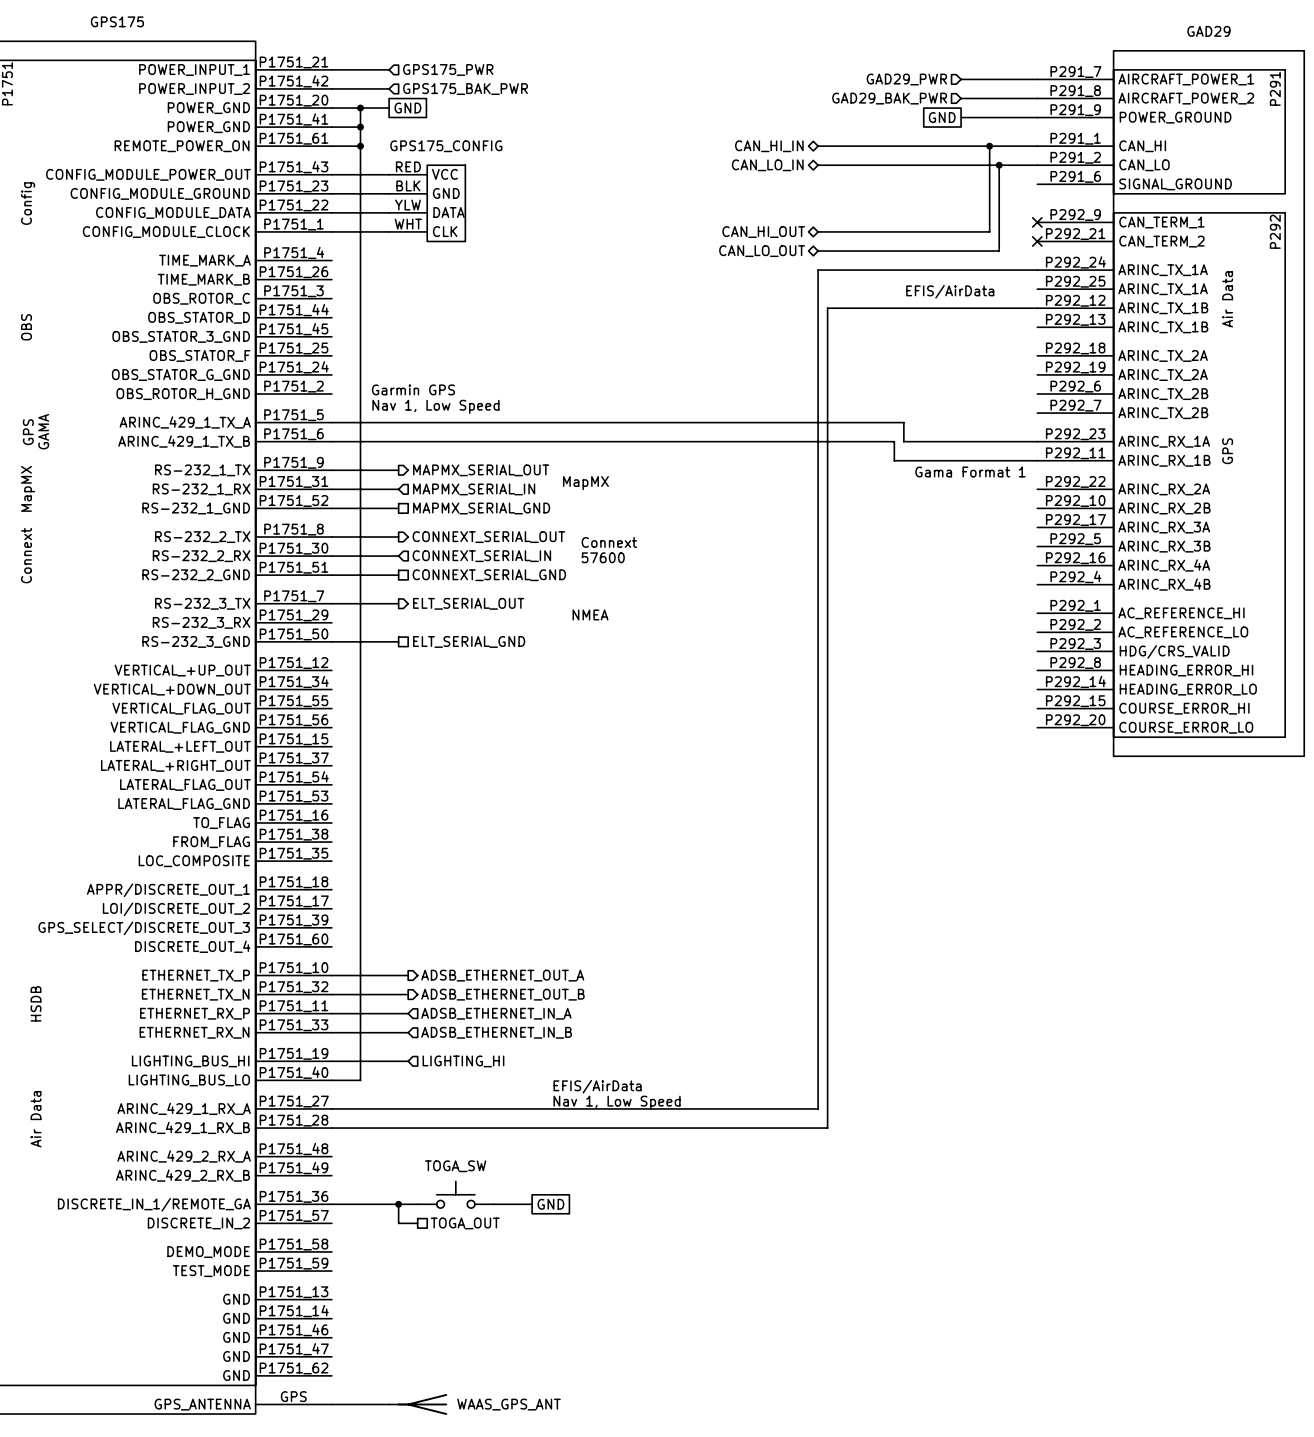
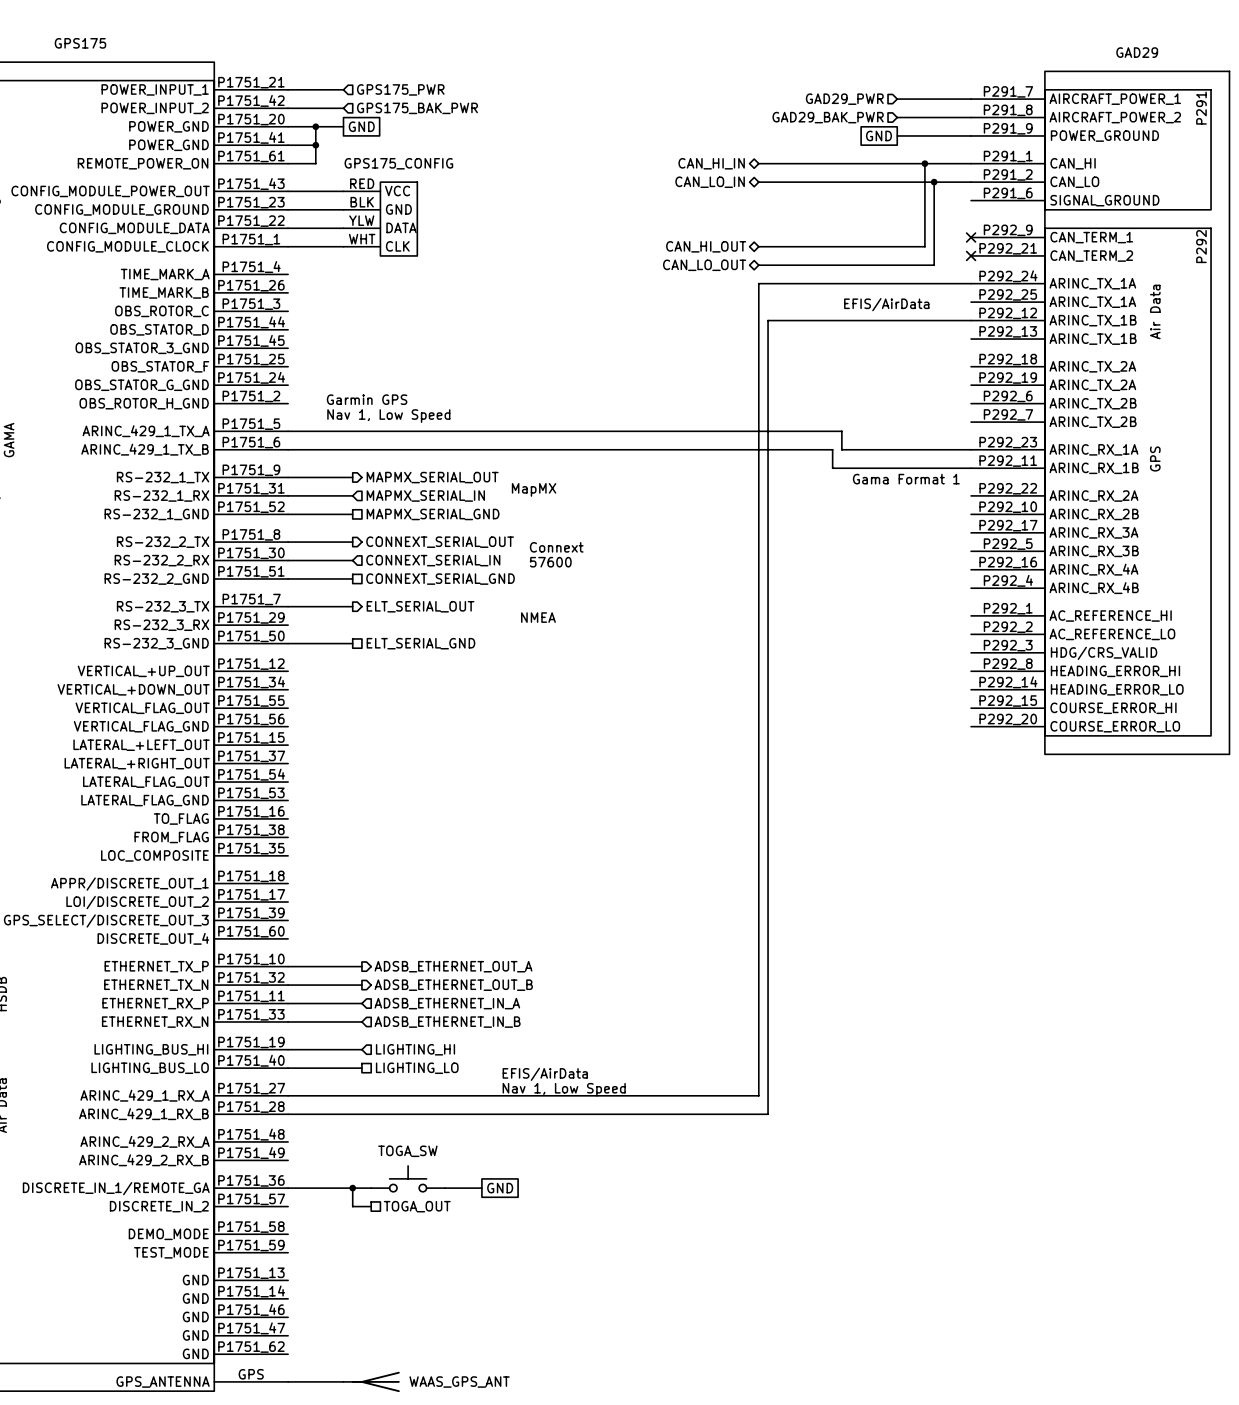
wire: (360, 146) (360, 1080) -> (361, 1068) (315, 1068)
junction: (360, 146) -> none
hierarchical label: none -> LIGHTING_LO (417, 1068)

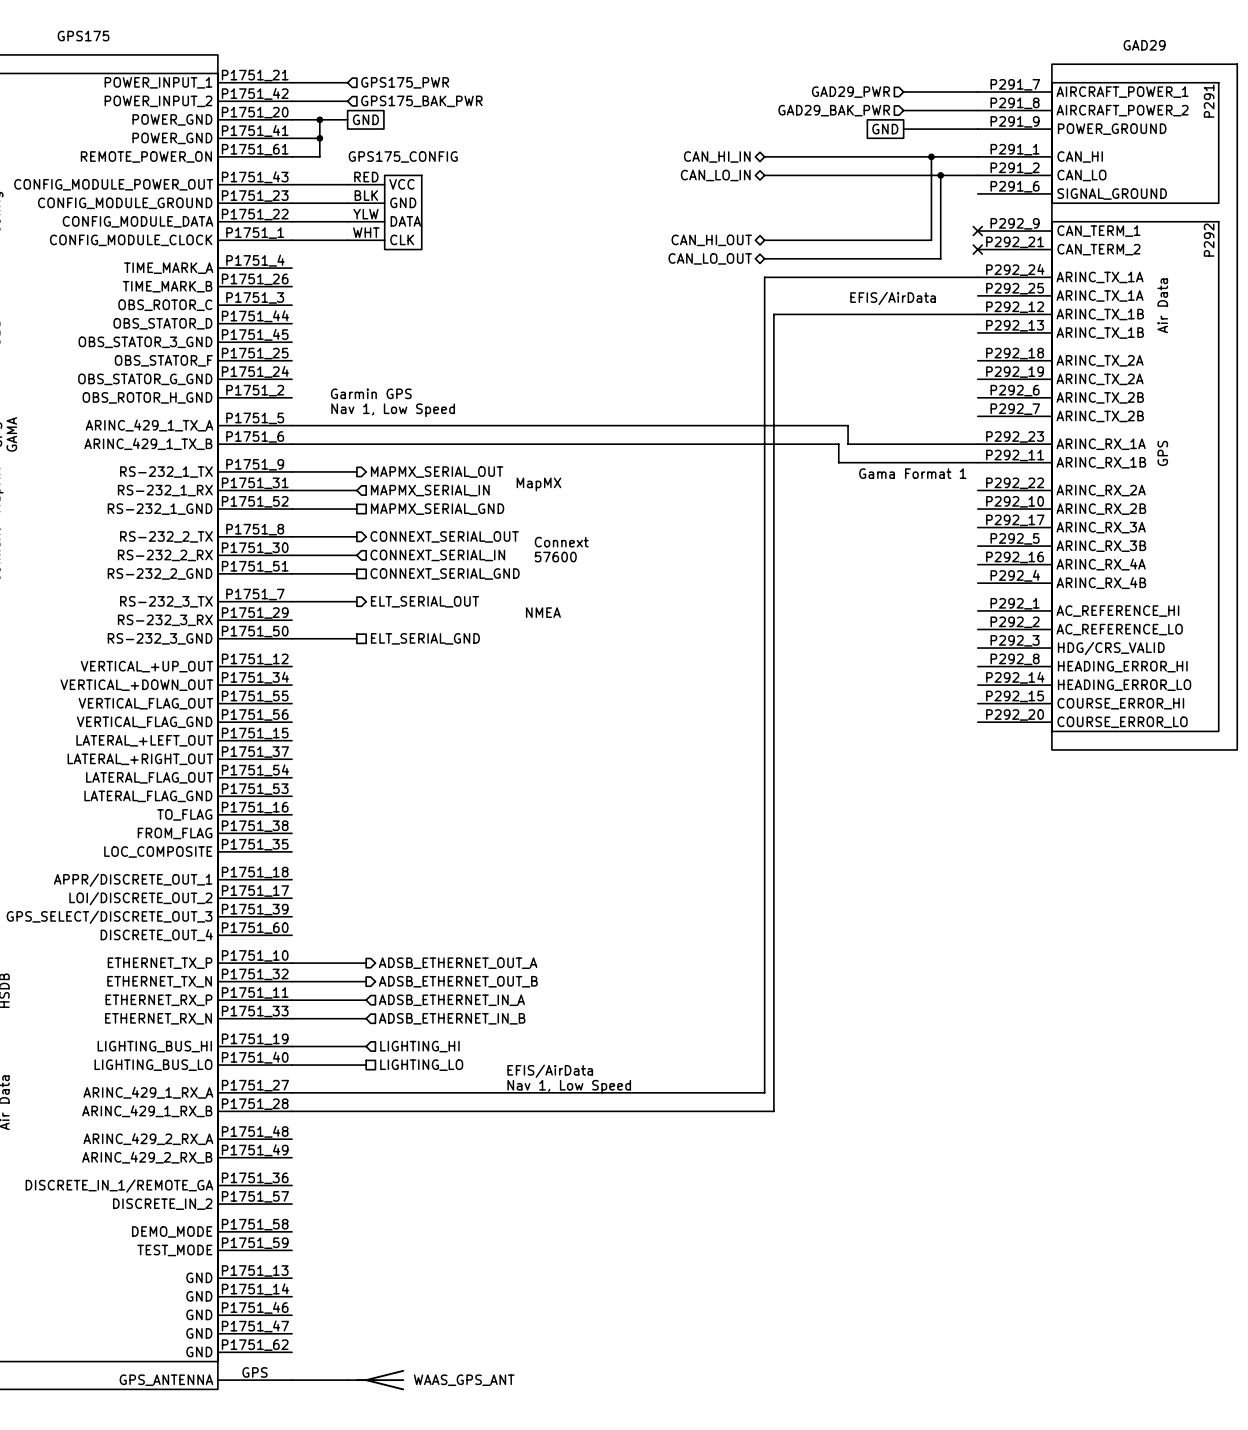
TOGA_SW: (408, 1178) -> none
wire: (288, 1188) (371, 1188) -> none
wire: (352, 1188) (352, 1206) (371, 1206) -> none
junction: (352, 1188) -> none
wire: (445, 1188) (481, 1188) -> none
global label: GND (500, 1188) -> none
hierarchical label: TOGA_OUT (417, 1206) -> none

